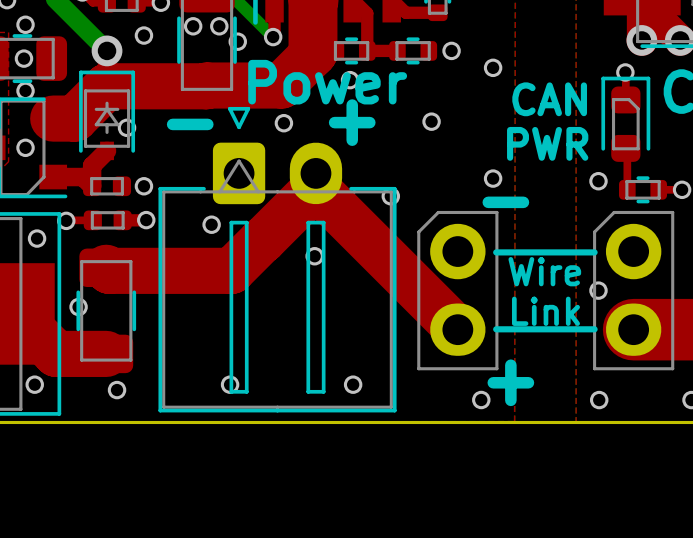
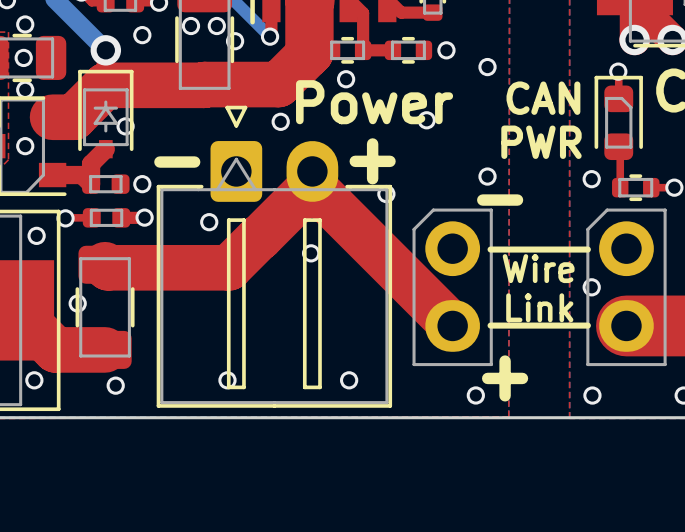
text position: Power (327, 82) -> Power (374, 102)
text position: + (352, 122) -> + (372, 161)
text position: - (190, 124) -> - (177, 162)

